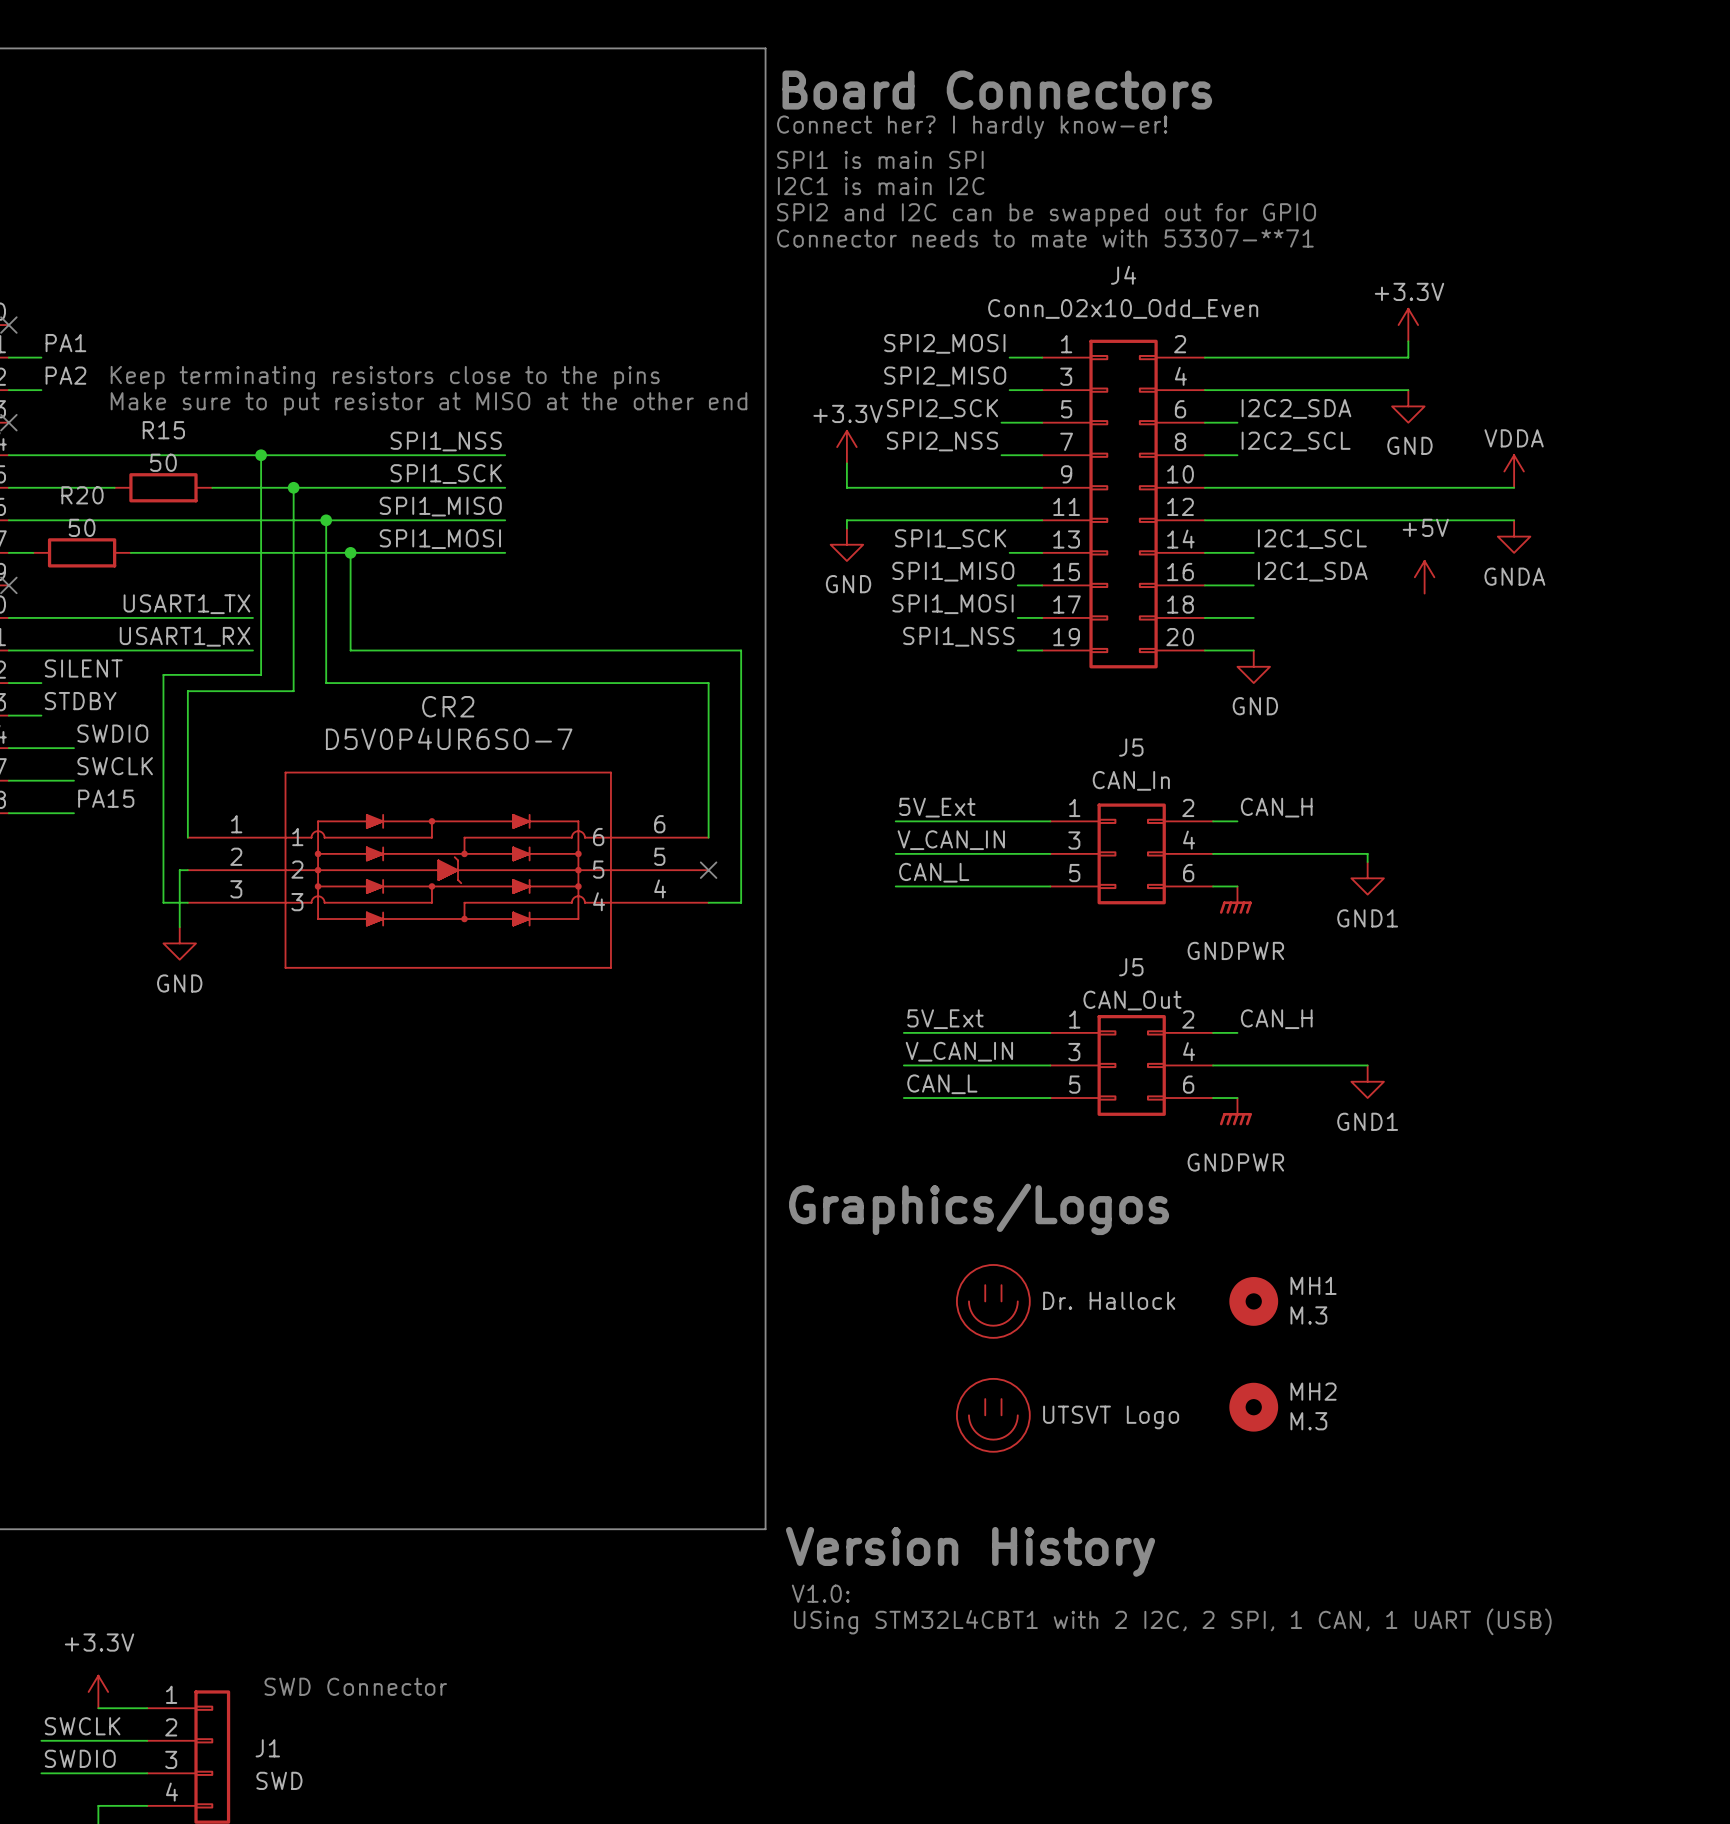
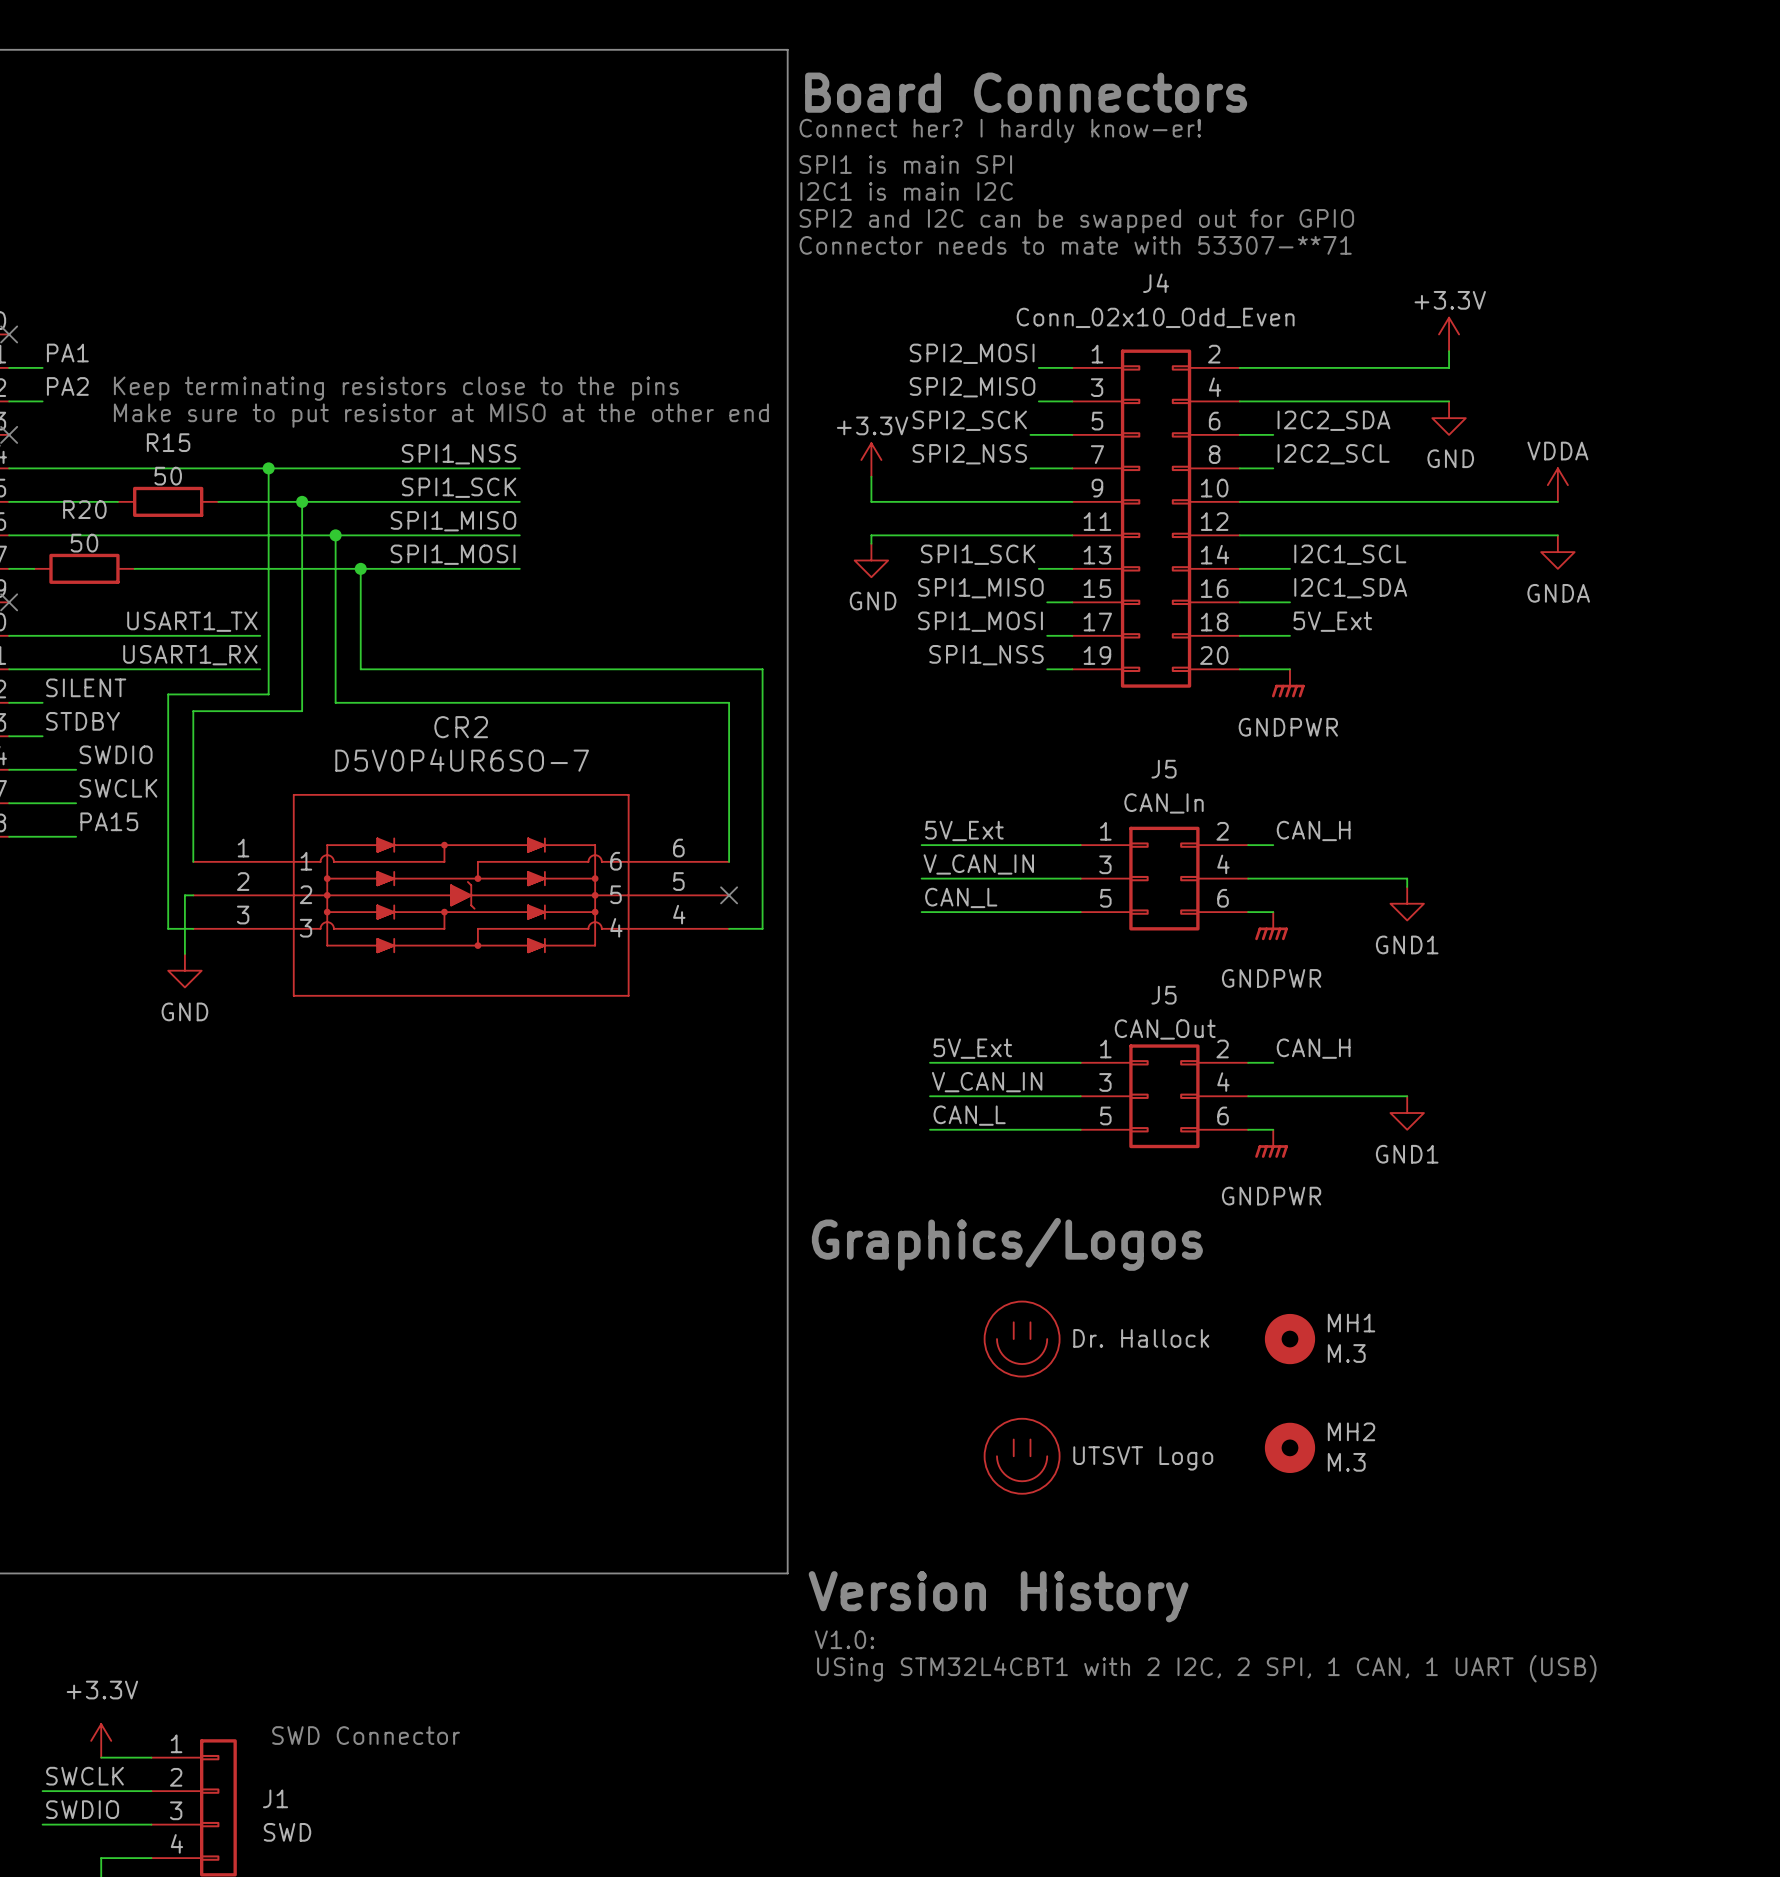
power symbol: +5V (1424, 577) -> none
label: none -> 5V_Ext (1332, 621)
power symbol: GND (1253, 666) -> GNDPWR (1288, 683)

